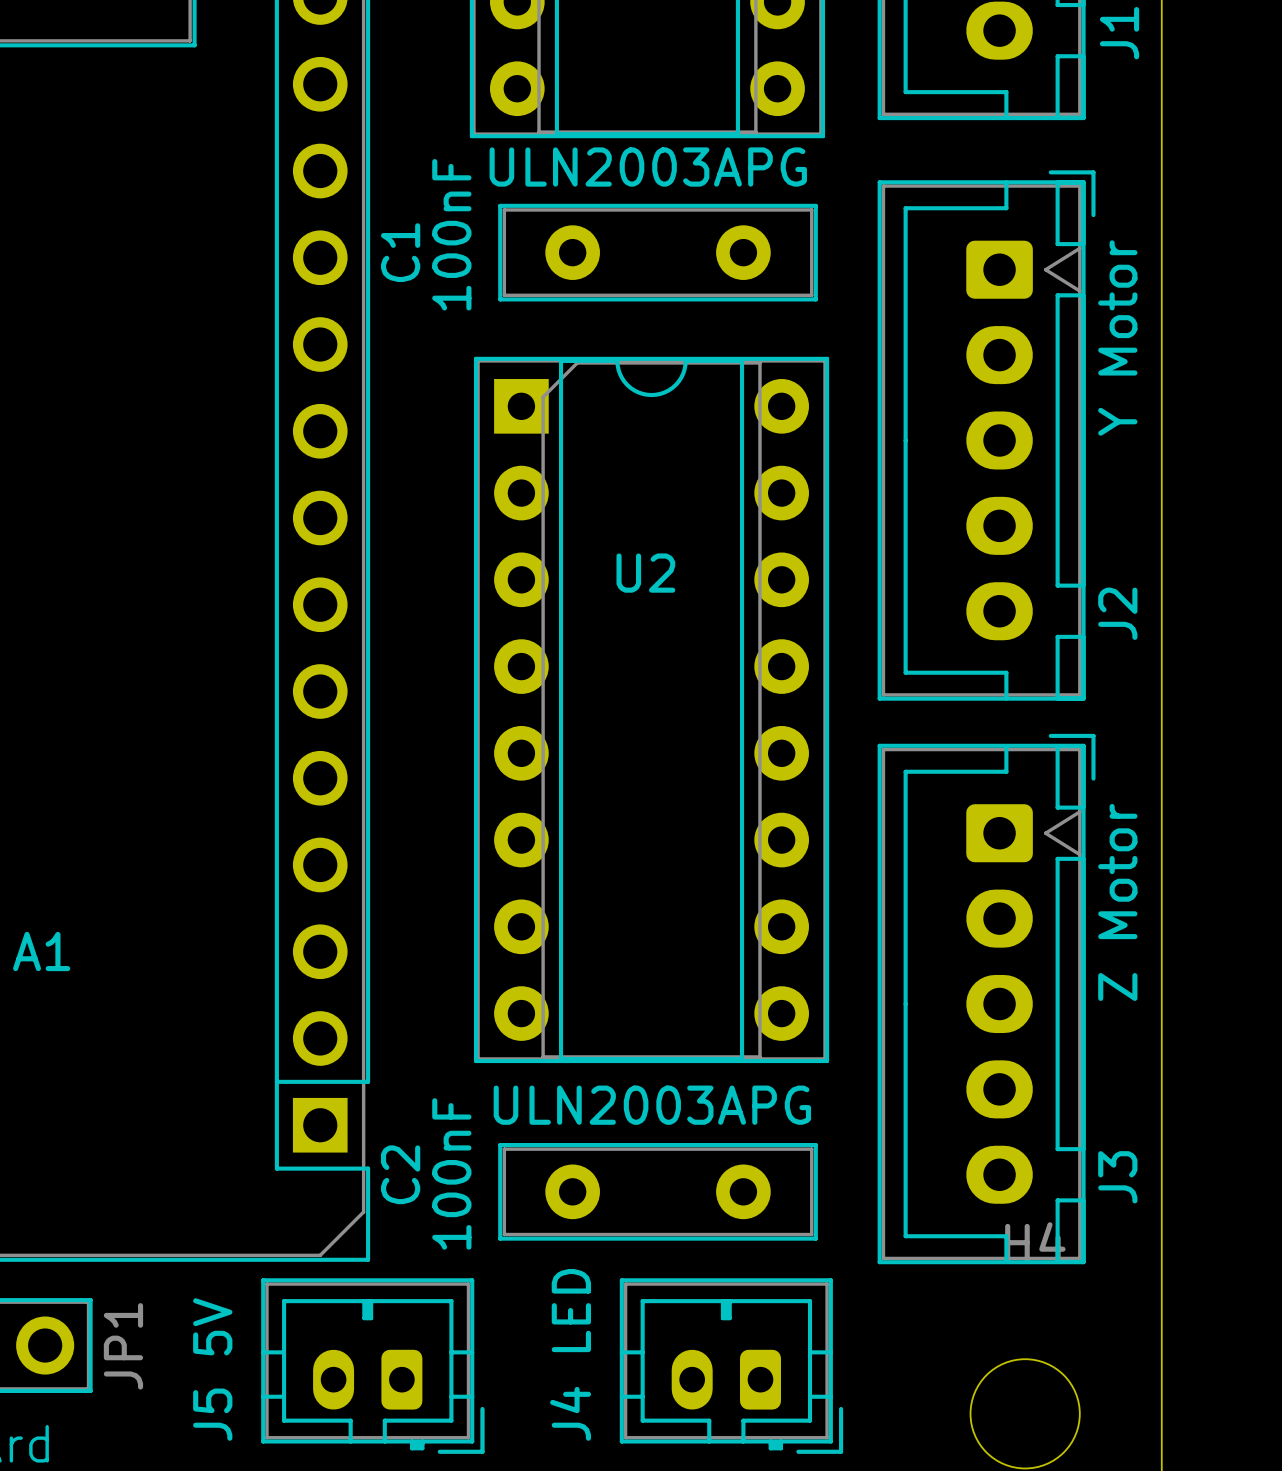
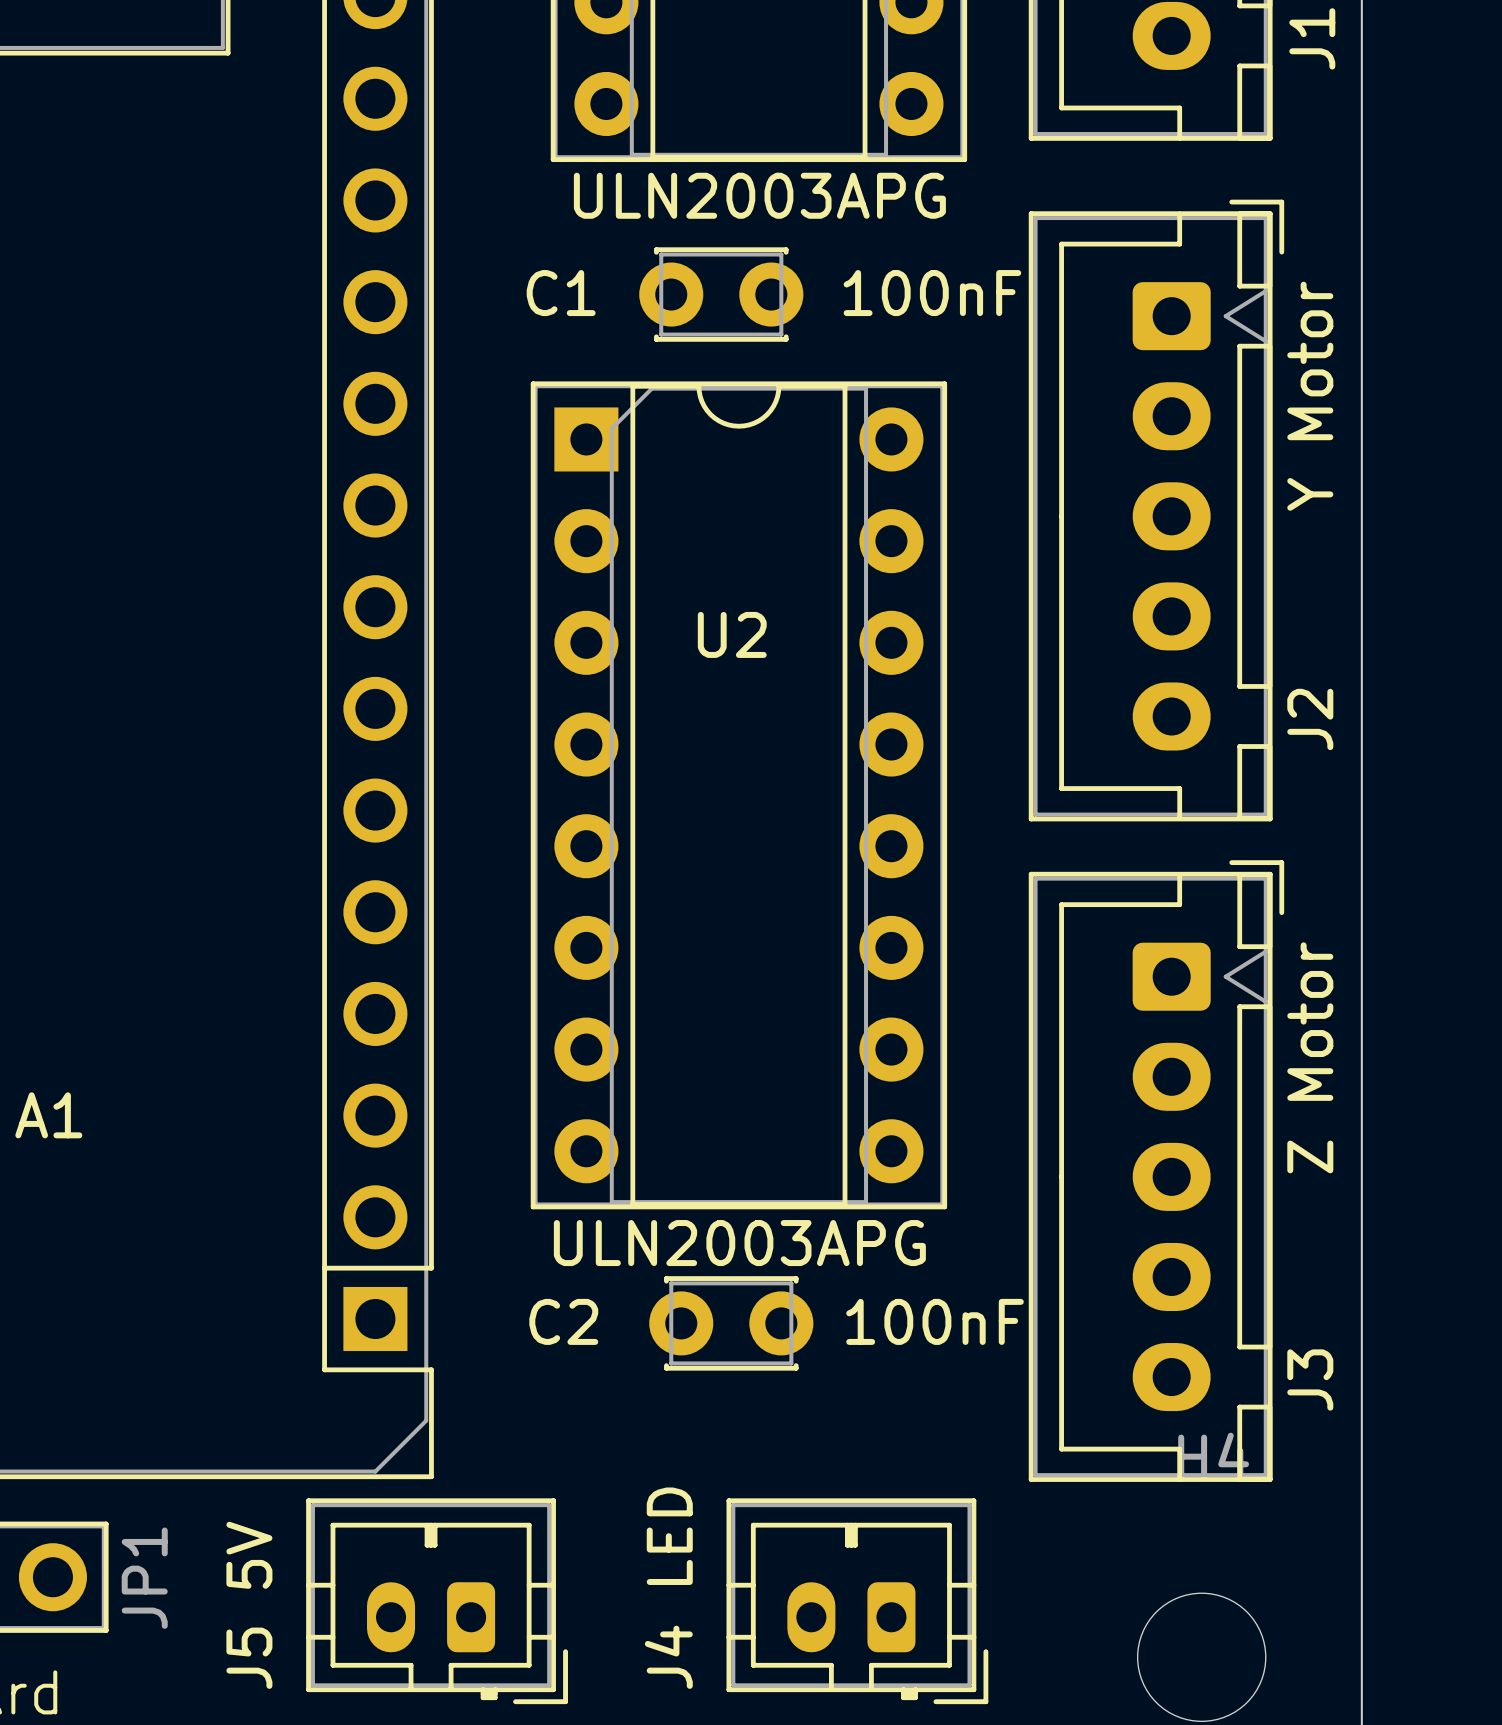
C1 footprint: [498, 203, 818, 302] -> [639, 247, 804, 342]
C1 value position: 100nF (451, 234) -> 100nF (932, 293)
C1 name position: C1 (400, 252) -> C1 (561, 293)
U2 position: (651, 709) -> (738, 795)
U2 value position: ULN2003APG (652, 1105) -> ULN2003APG (739, 1243)
C2 footprint: [498, 1143, 818, 1241] -> [649, 1276, 814, 1371]
C2 value position: 100nF (451, 1173) -> 100nF (935, 1321)
C2 name position: C2 (400, 1174) -> C2 (563, 1321)

